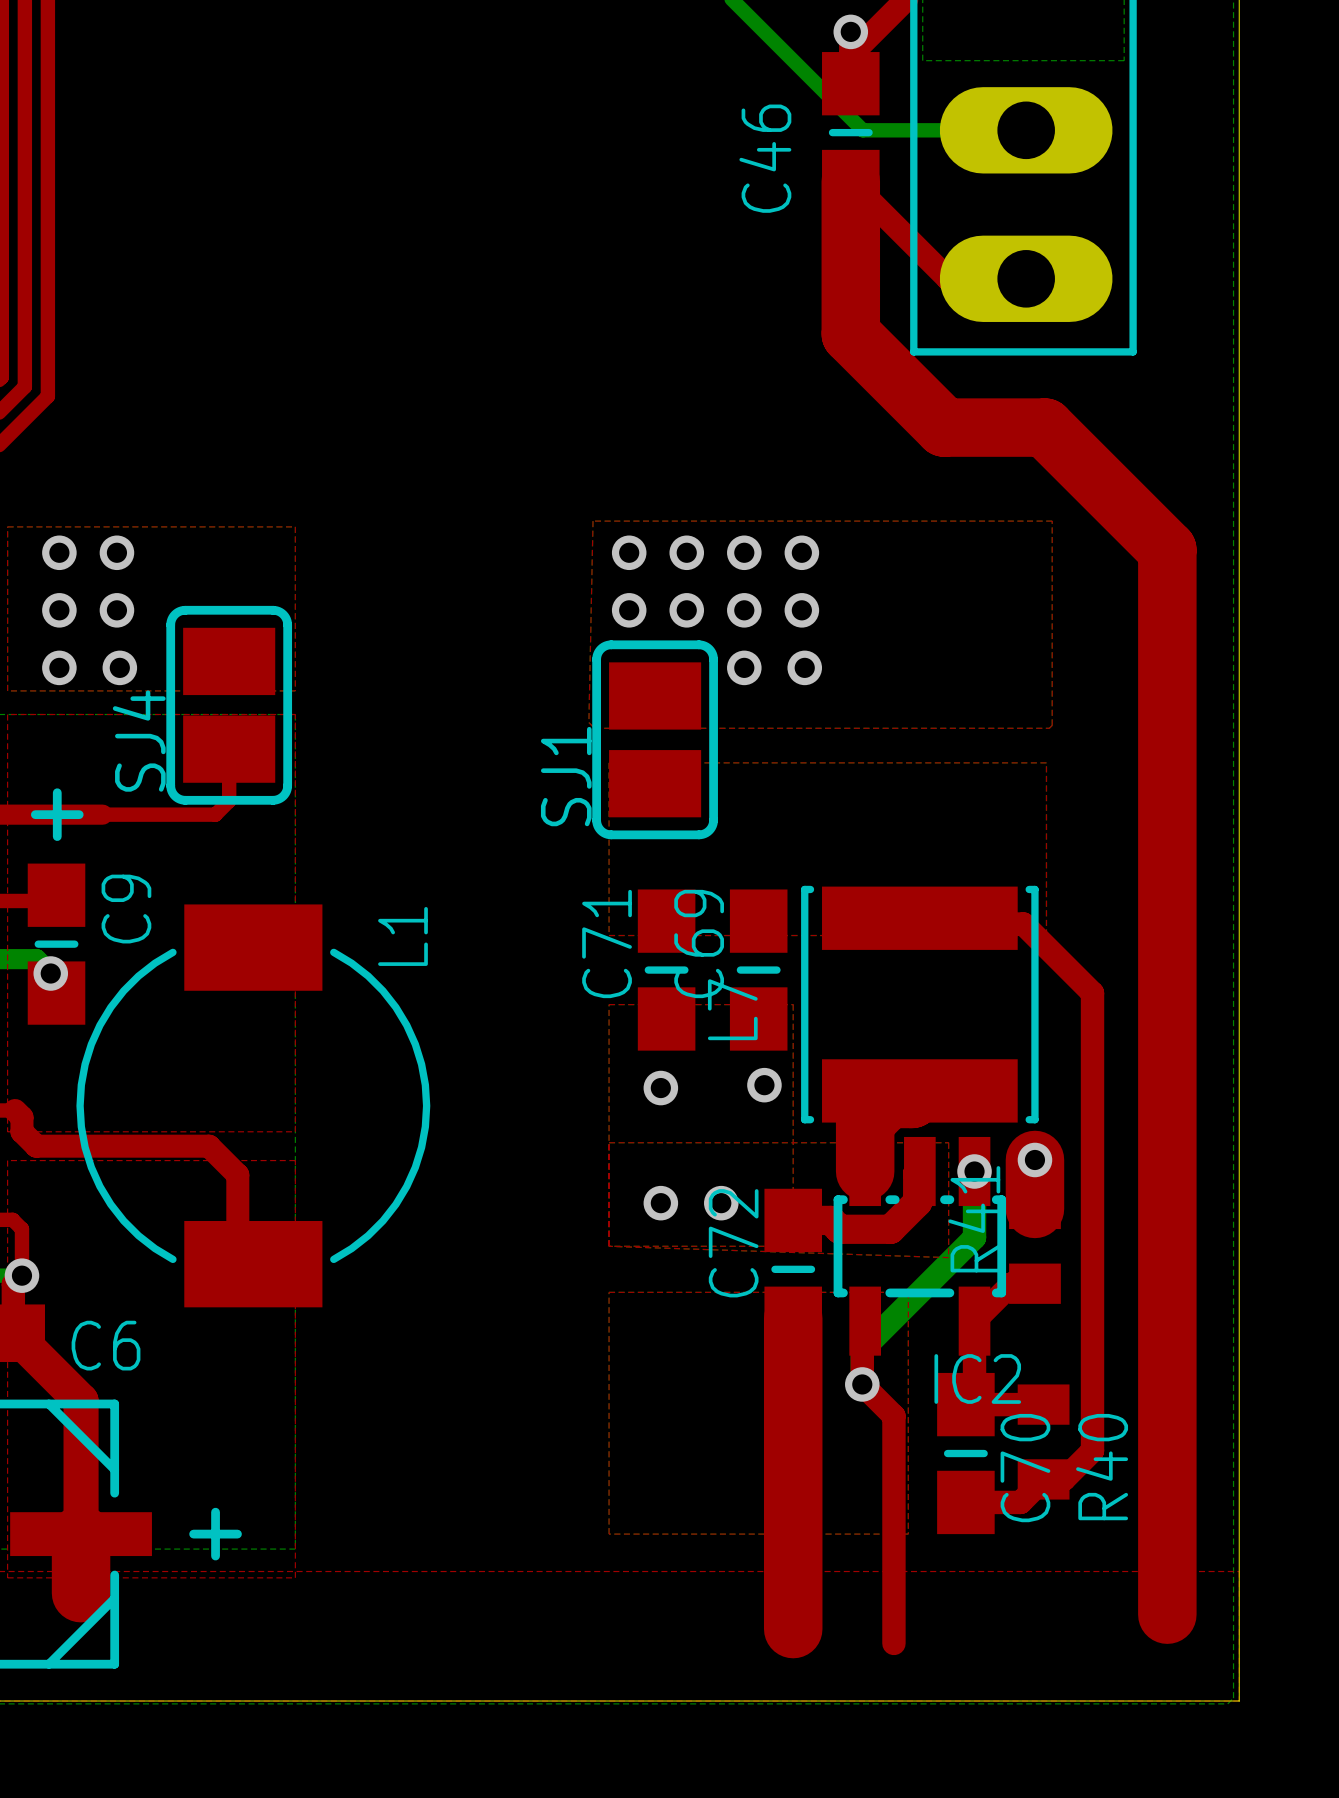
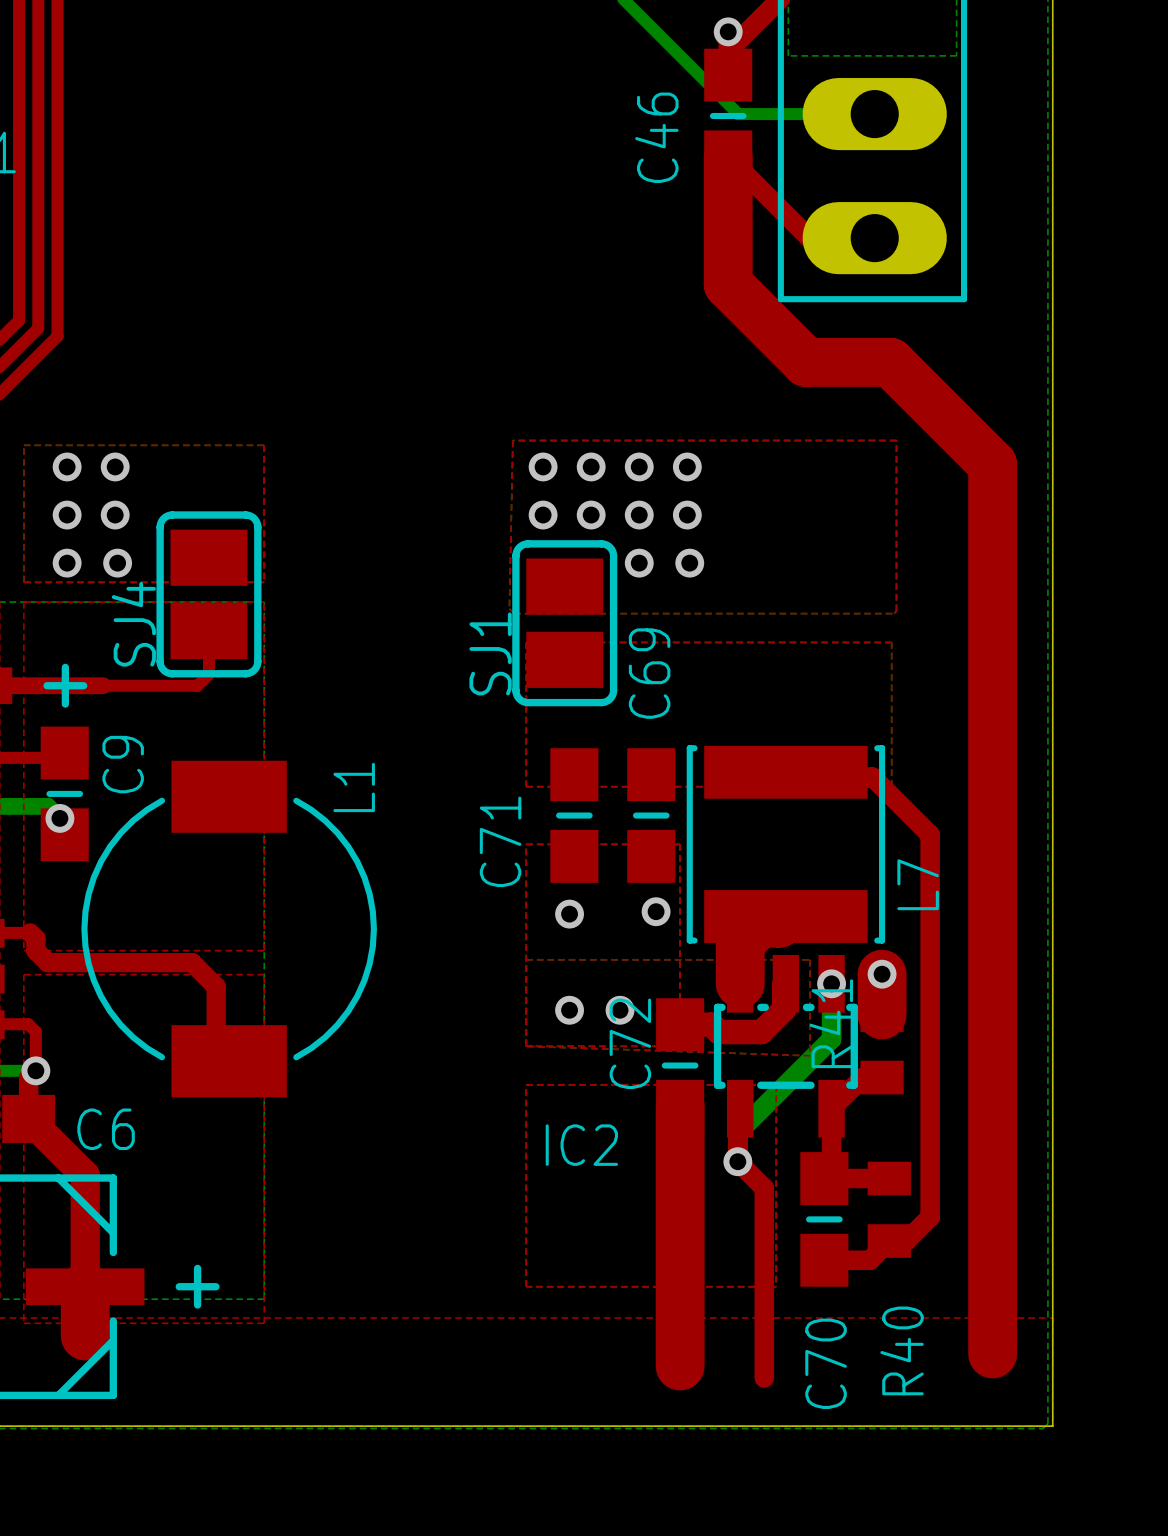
C71 name position: C71 (607, 943) -> C71 (500, 841)
C69 name position: C69 (699, 943) -> C69 (649, 673)
L7 name position: L7 (732, 1009) -> L7 (918, 884)
IC2 name position: IC2 (977, 1378) -> IC2 (581, 1145)
R40 name position: R40 (1102, 1467) -> R40 (902, 1350)
C70 name position: C70 (1025, 1468) -> C70 (826, 1363)

